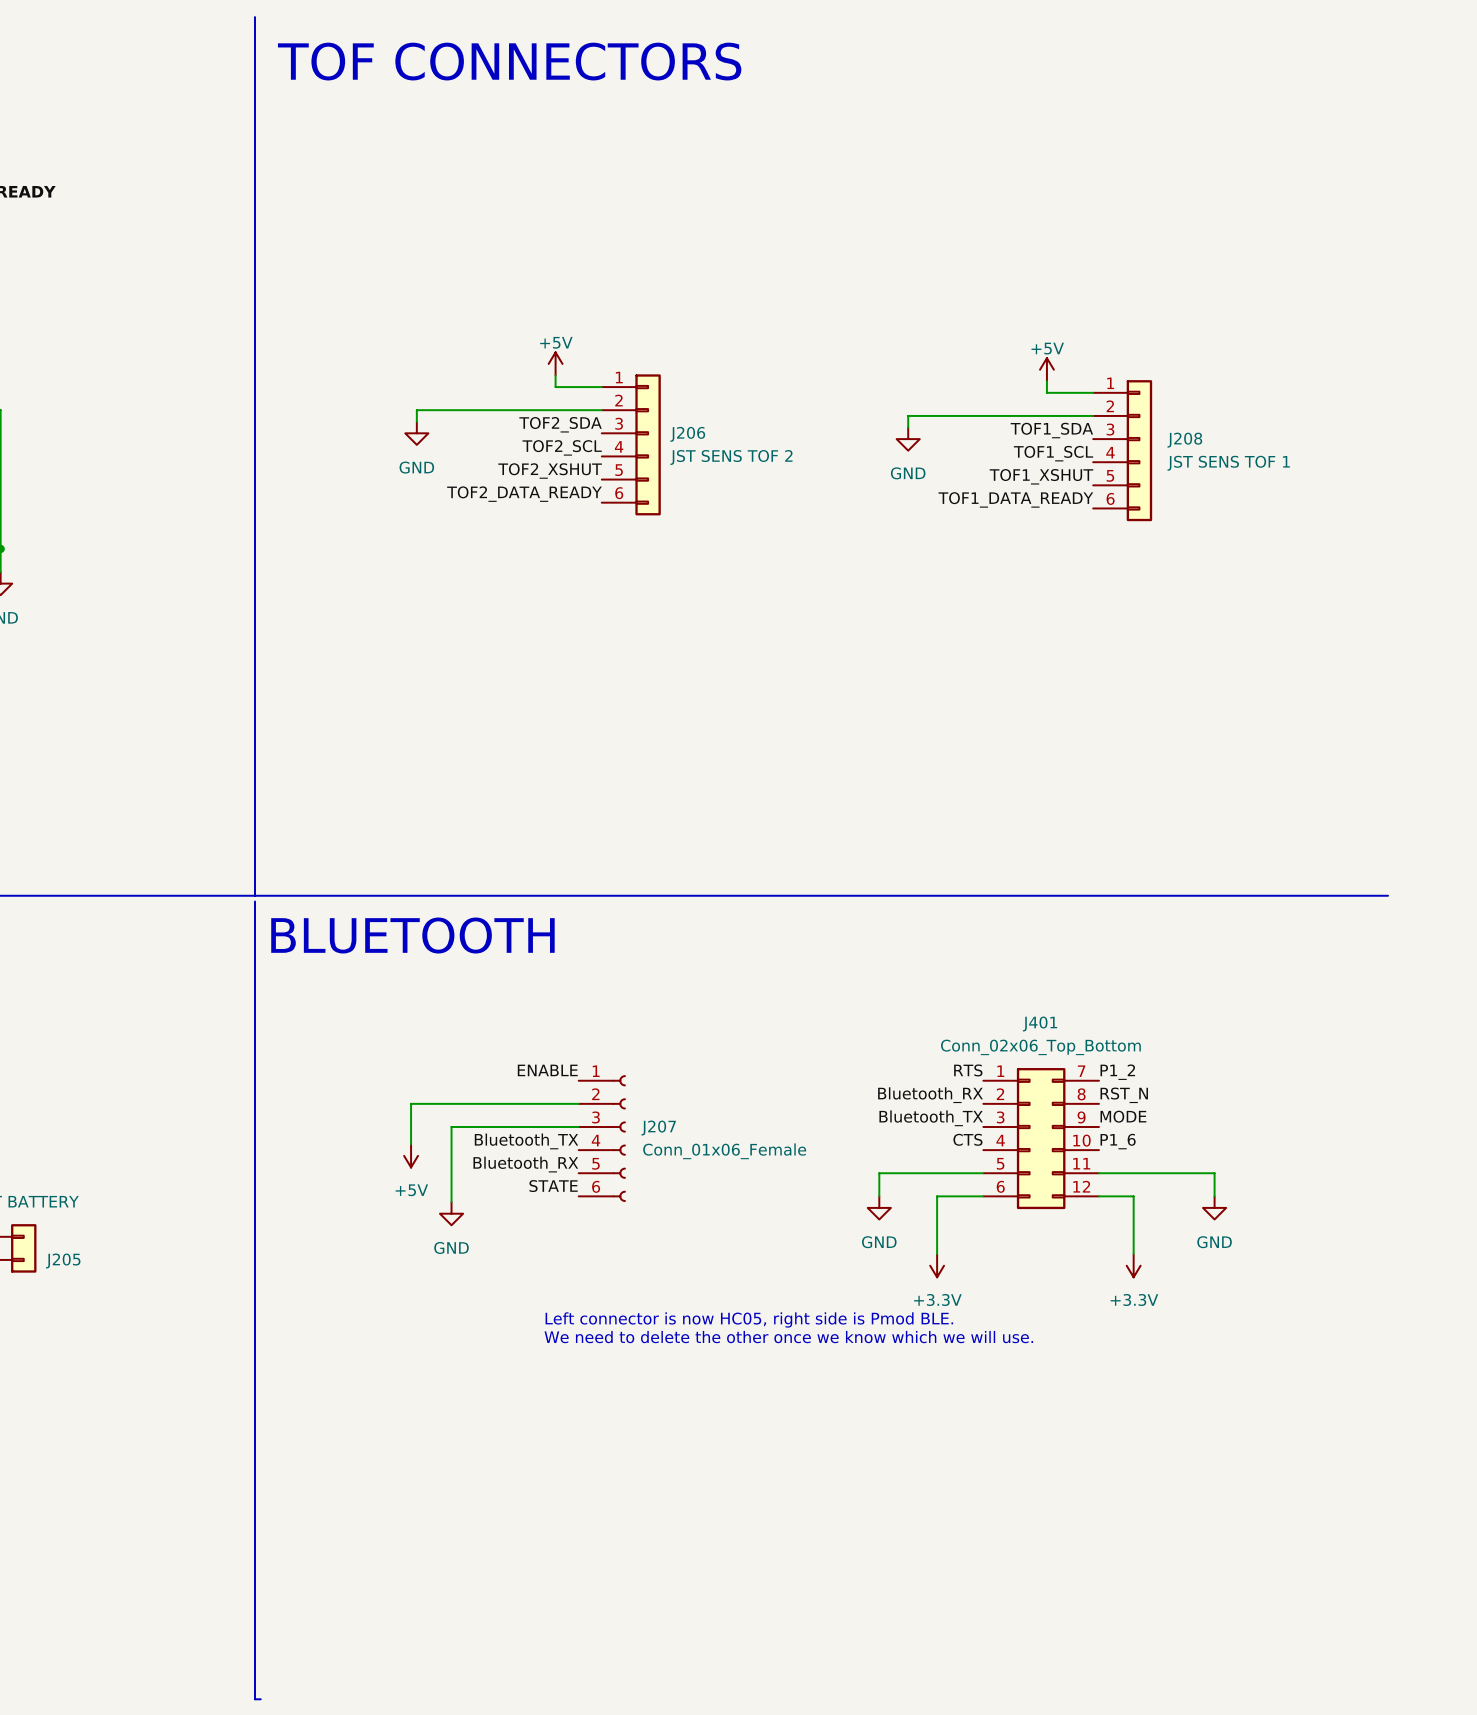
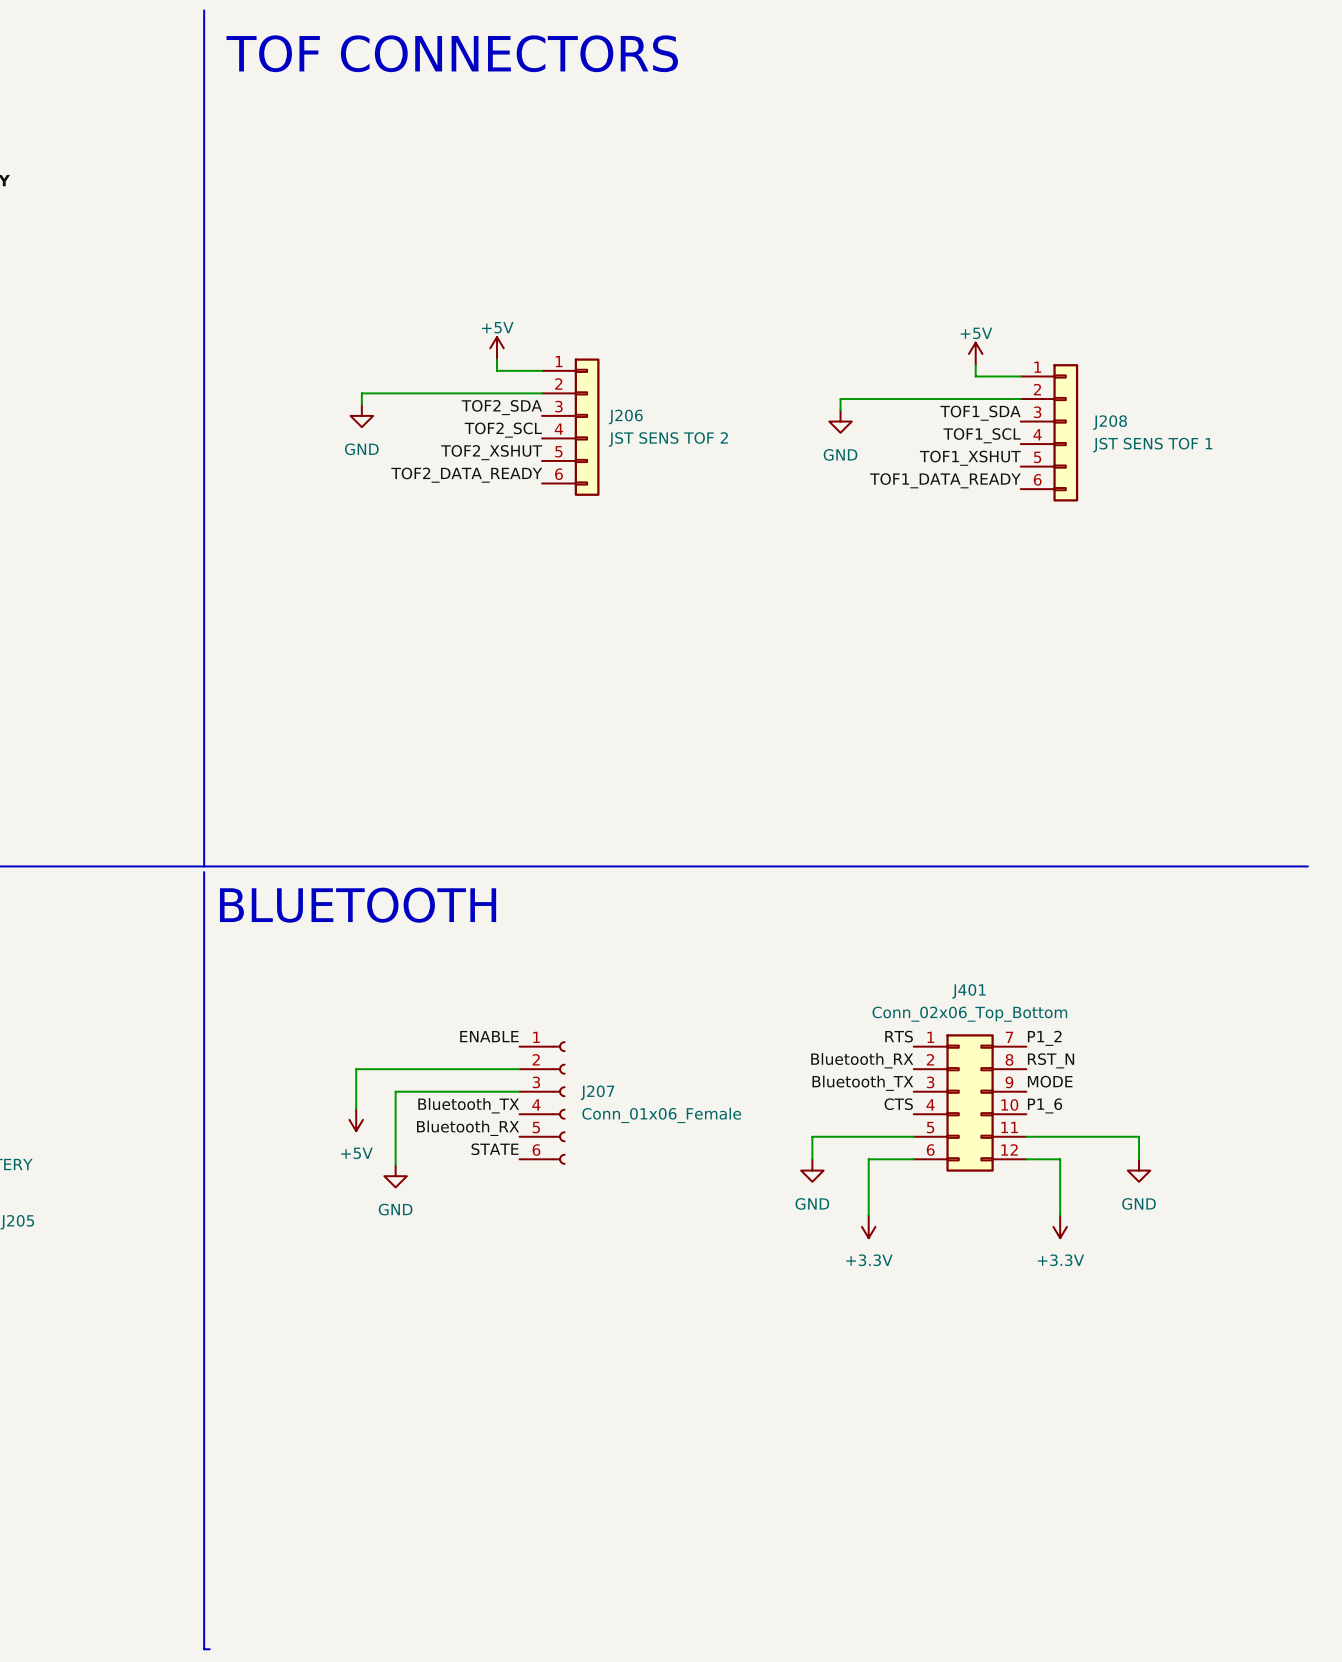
text: Left connector is now HC05, right side is Pmod BLE. (749, 1319) -> none
text: We need to delete the other once we know which we will use. (788, 1337) -> none

